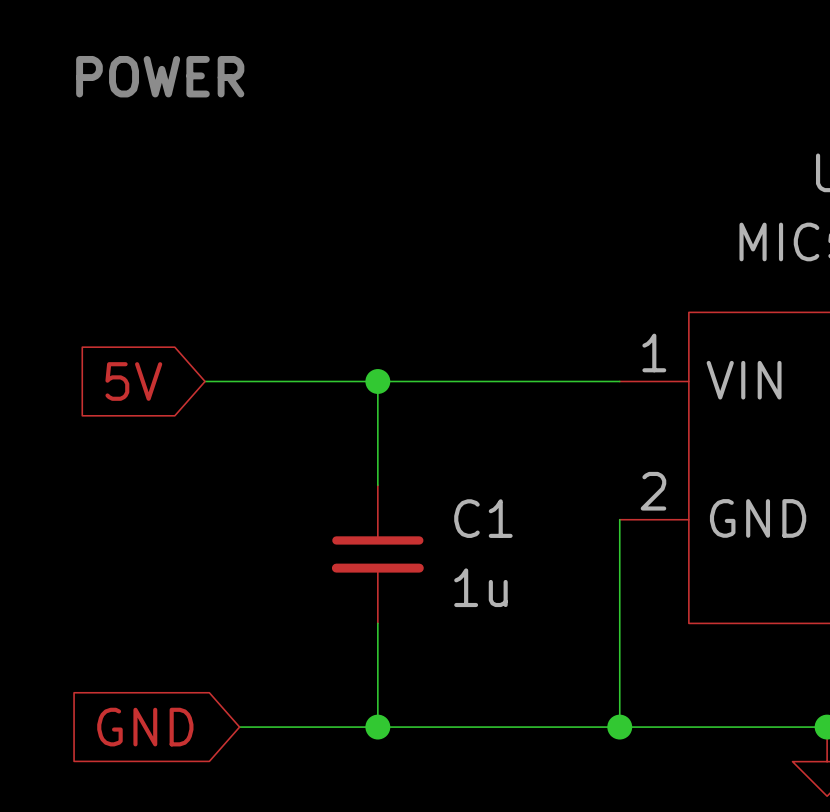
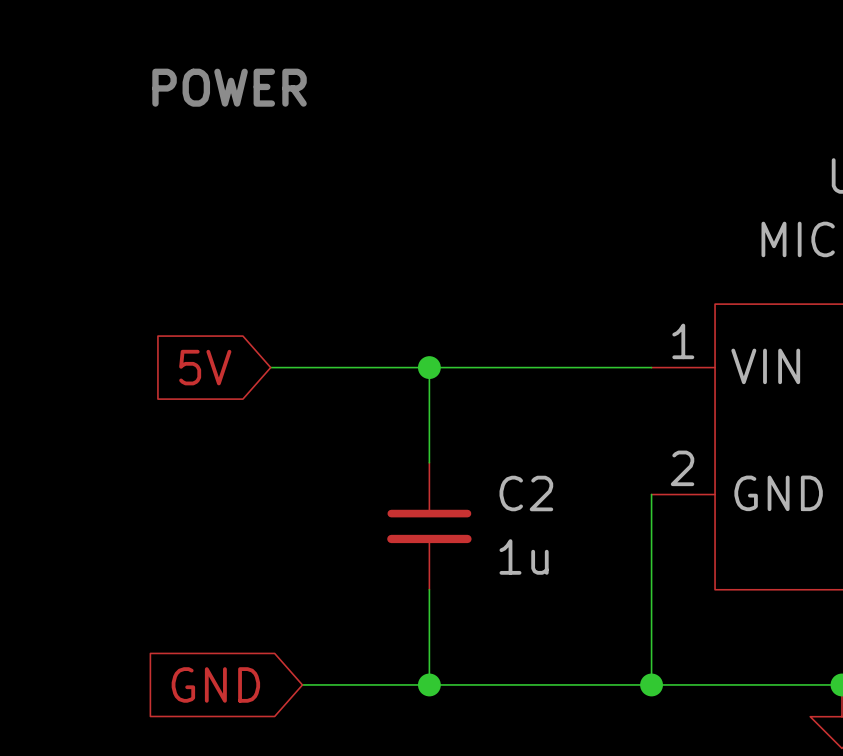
C1 name: C1 (483, 518) -> C2 (526, 493)

